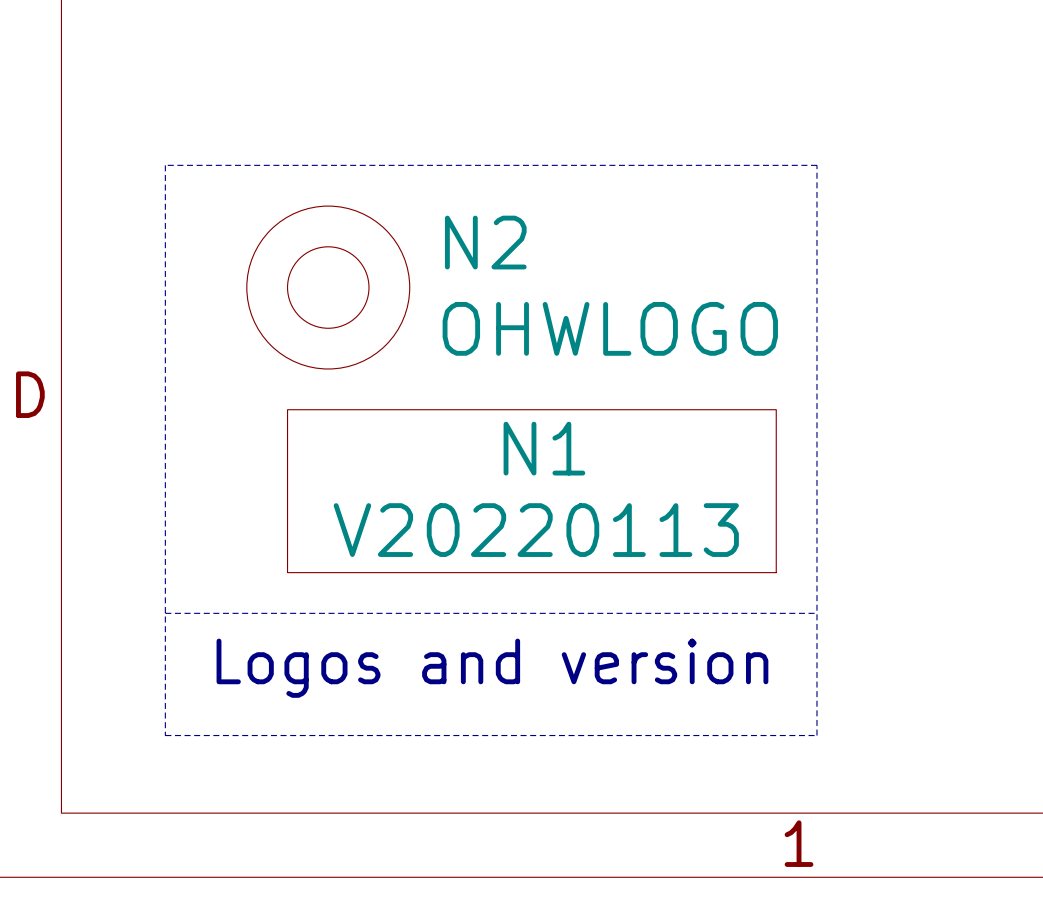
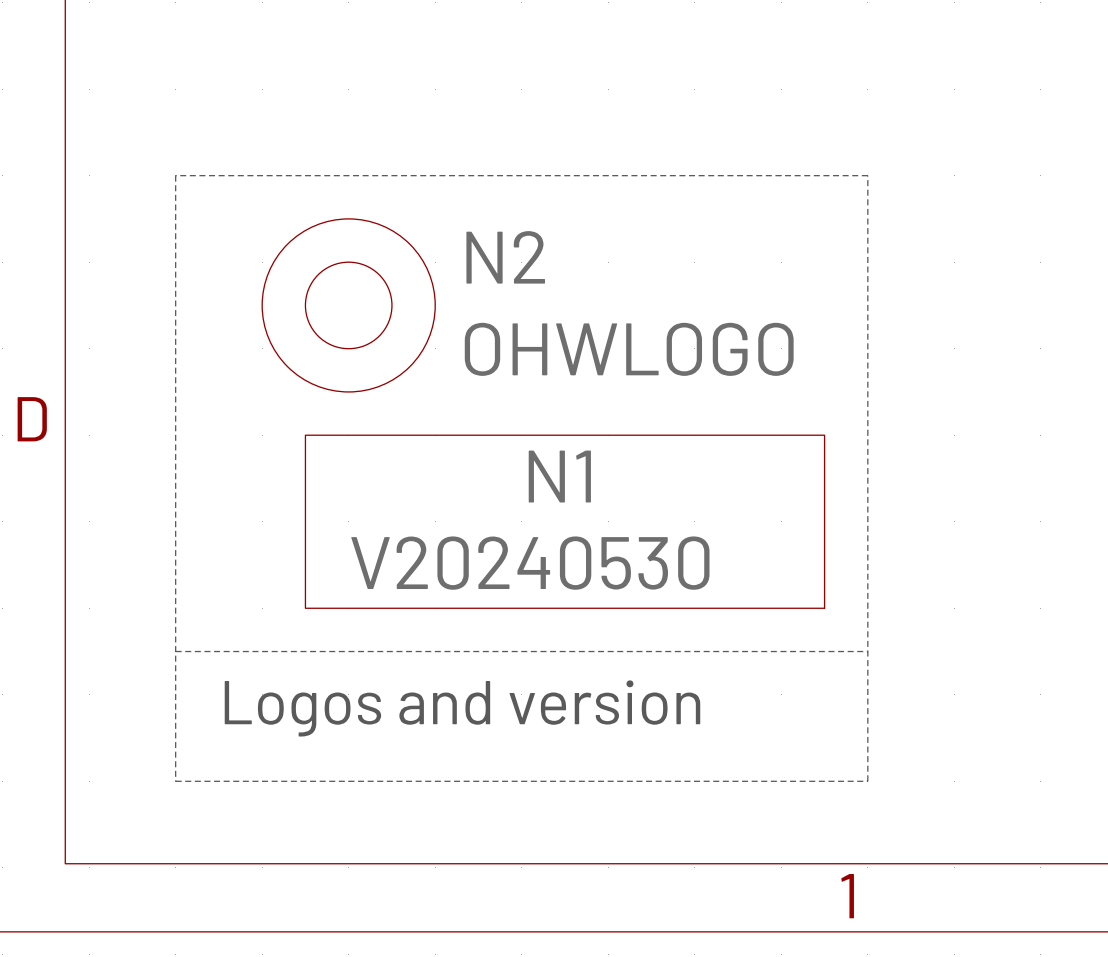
N1 value: V20220113 (536, 530) -> V20240530 (530, 563)

